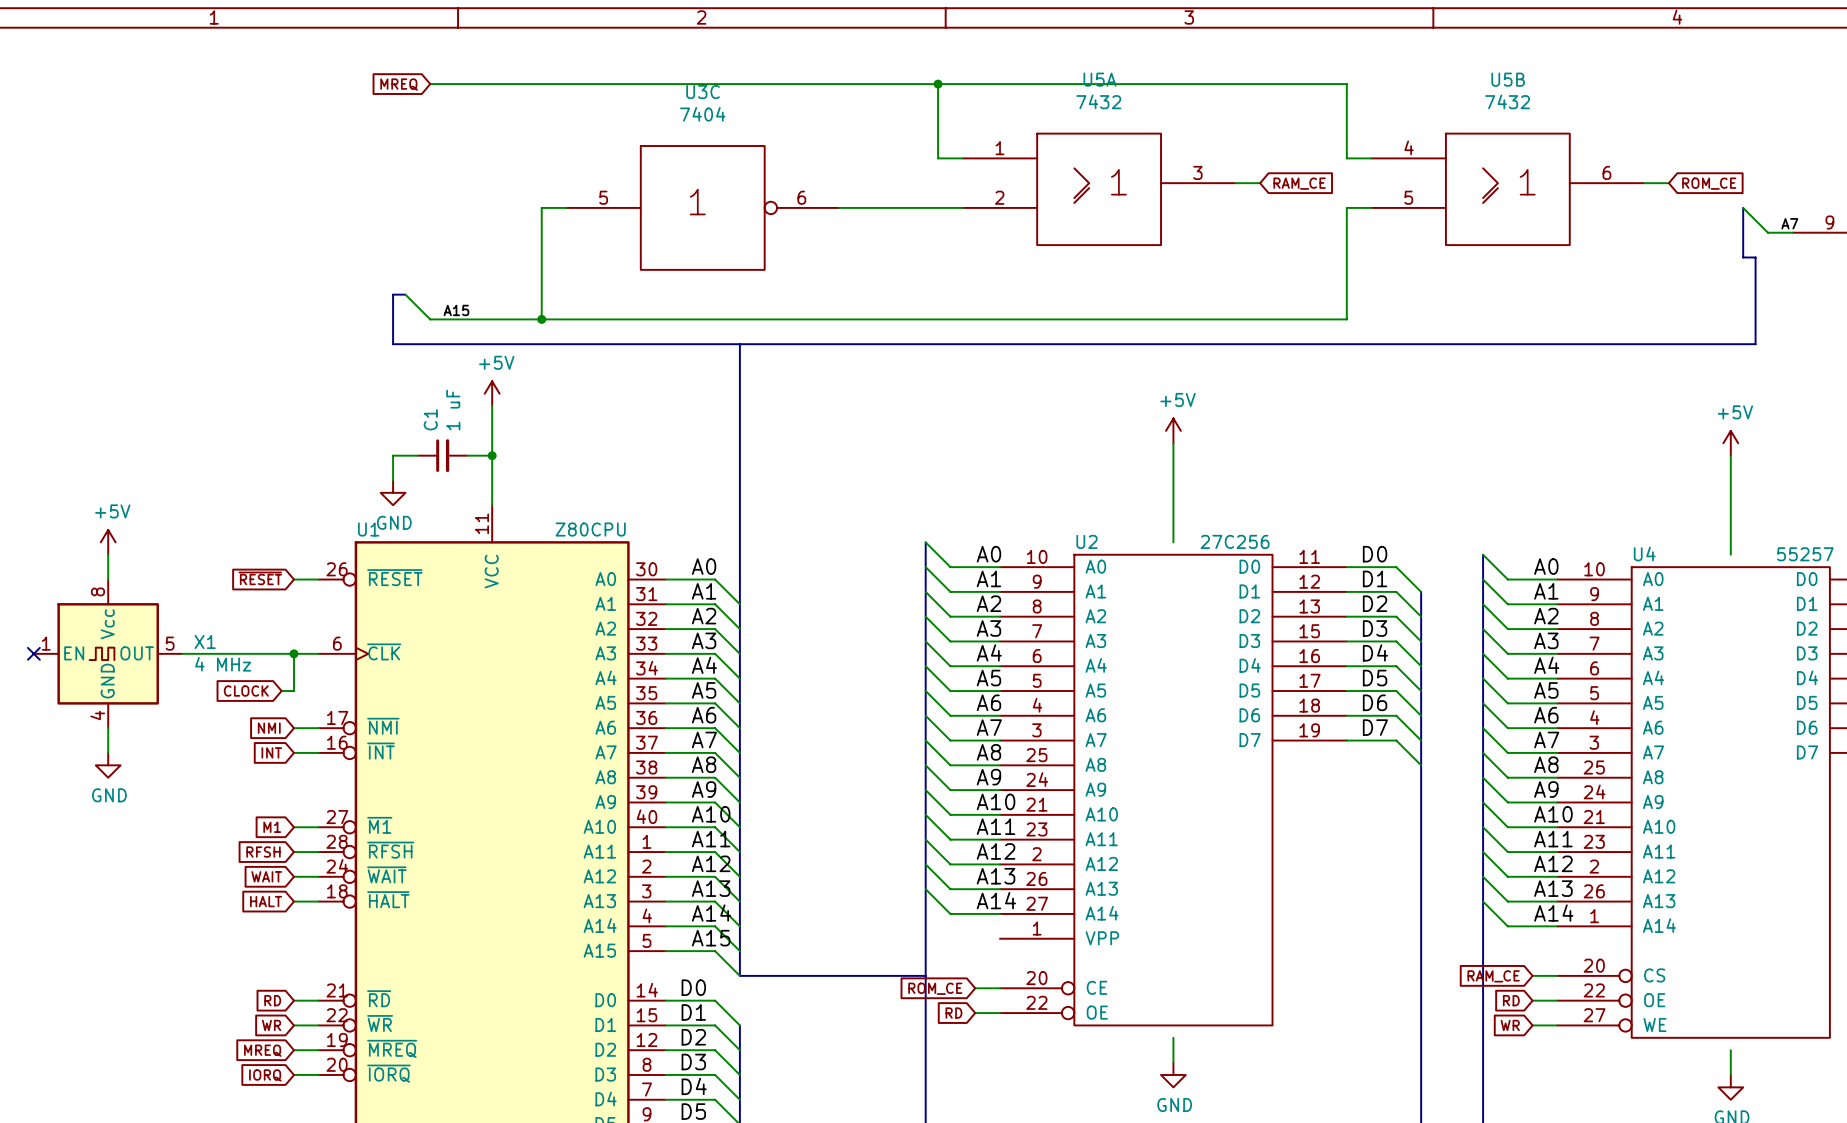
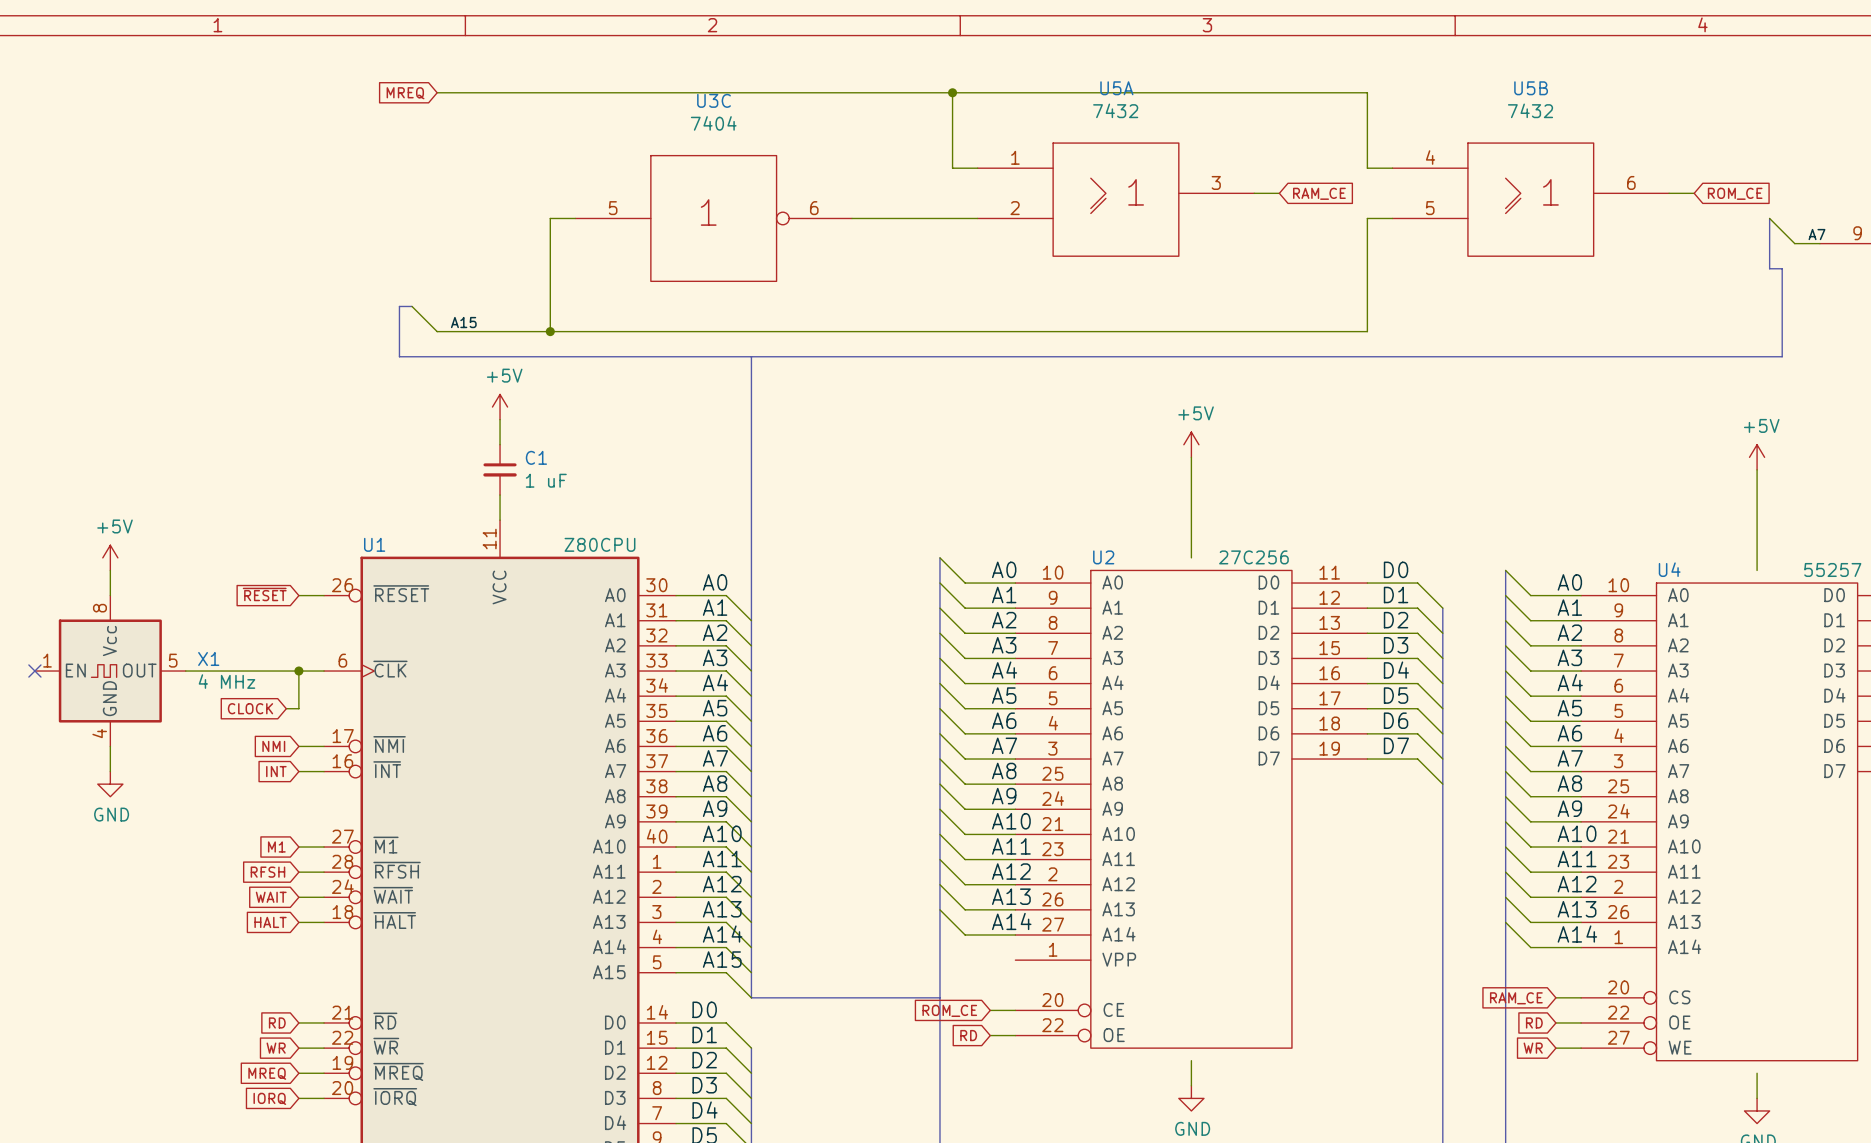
wire: (417, 455) (393, 455) (393, 480) -> none
C1 rotation: 0° (442, 455) -> 90° clockwise (500, 469)
C1 position: (442, 455) -> (500, 469)
wire: (467, 455) (492, 455) -> none
junction: (492, 455) -> none
power symbol: GND (393, 492) -> none

